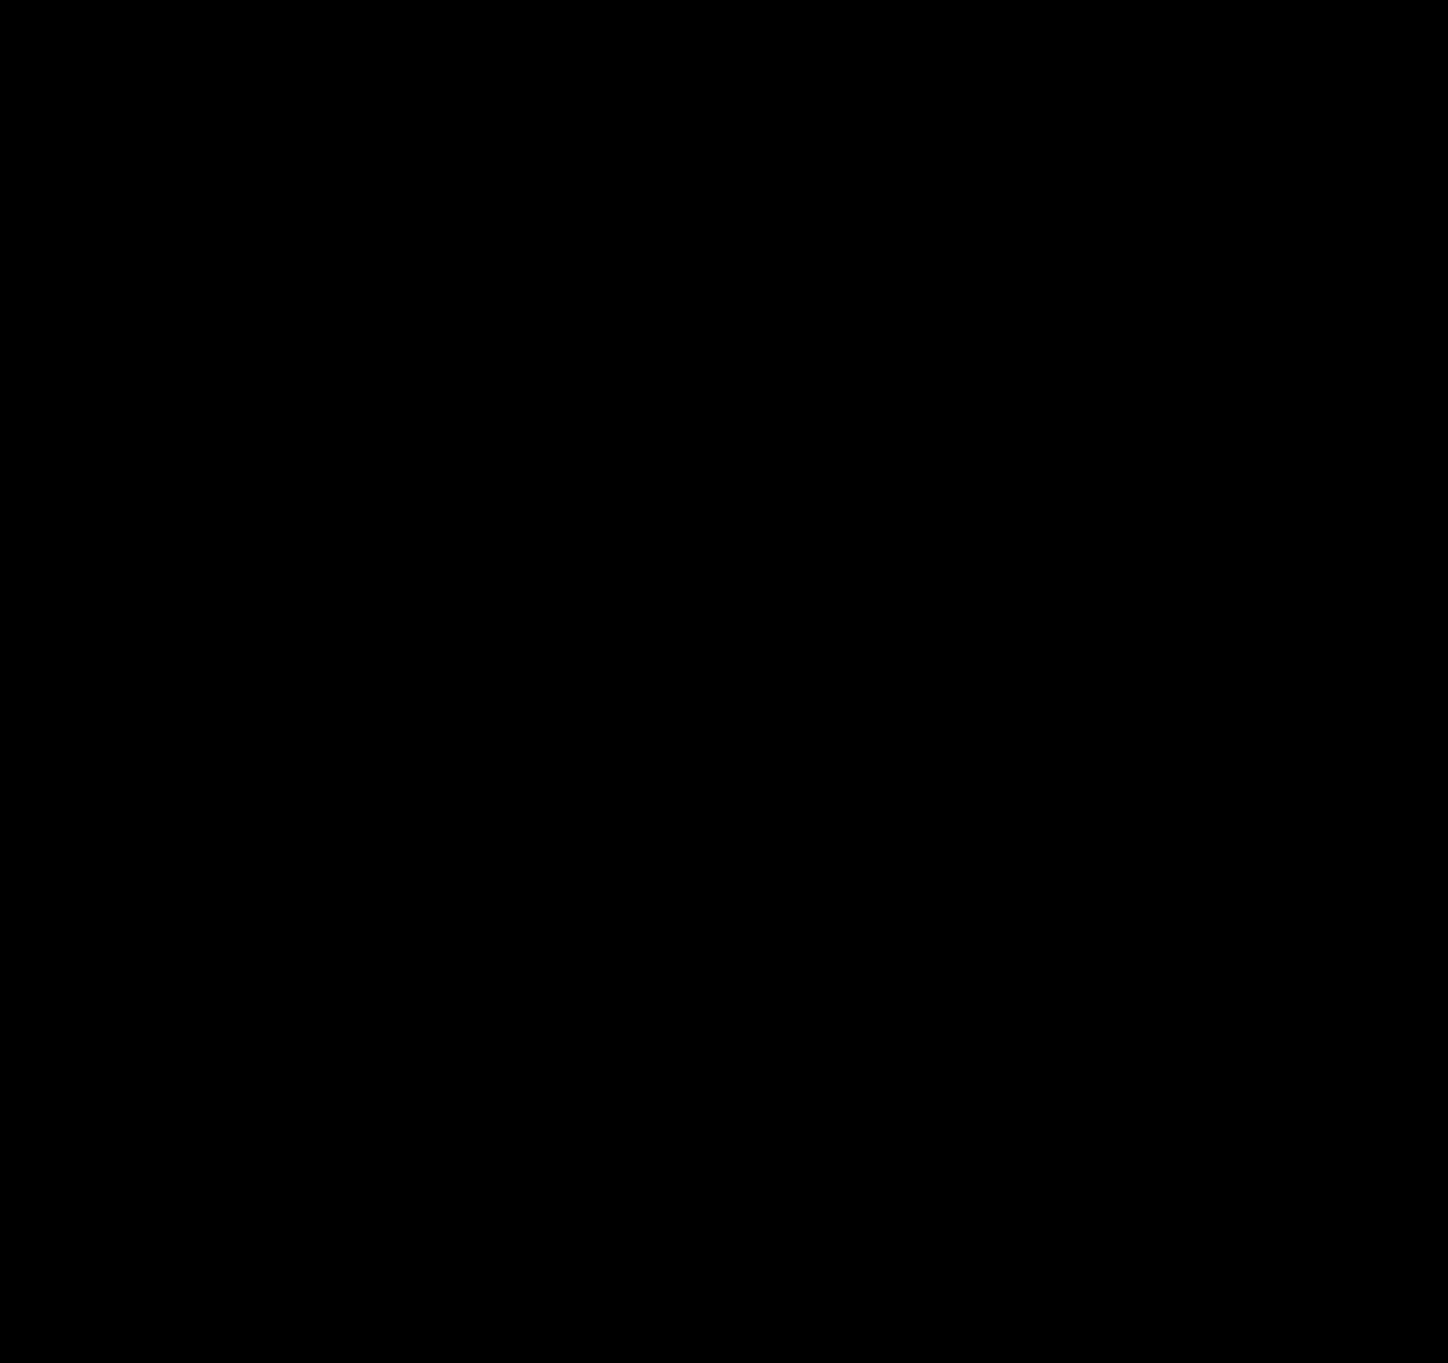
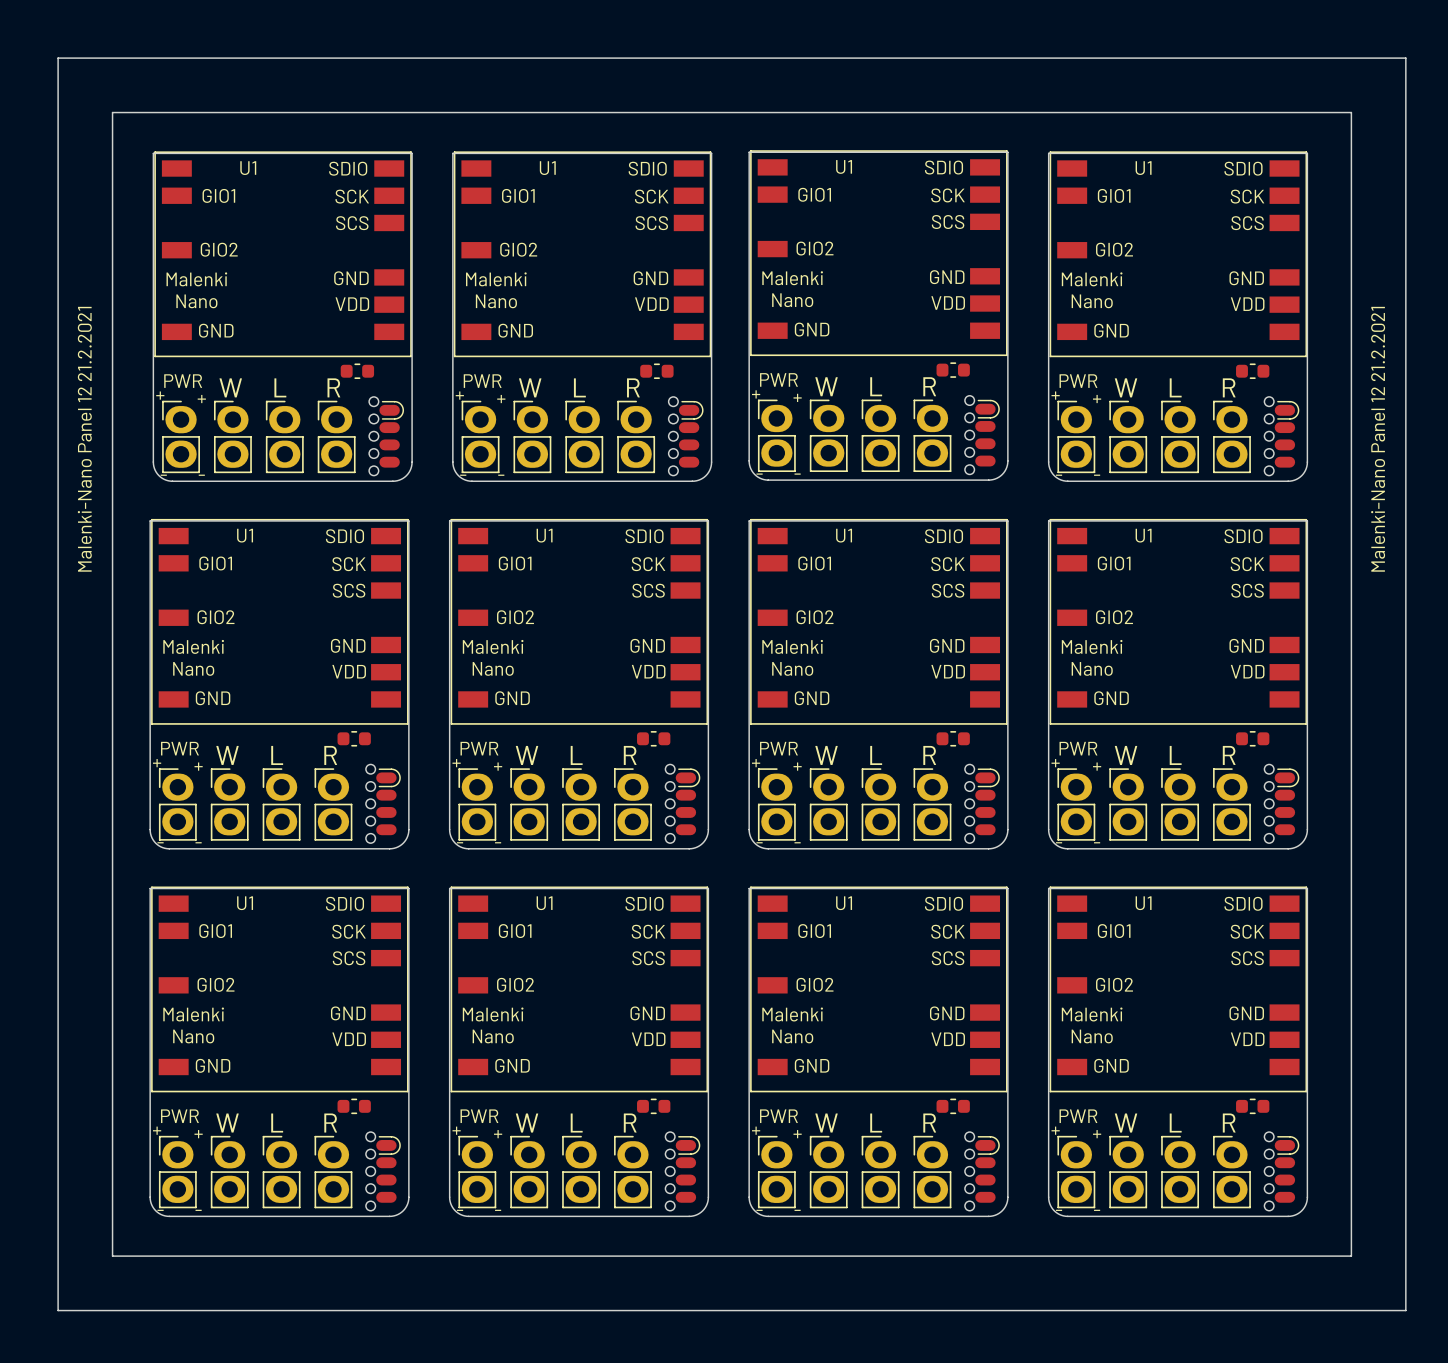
board edge: none -> (58, 58) (1405, 58) (1405, 1310) (58, 1310) (58, 58)
board edge: none -> (112, 112) (112, 1256) (1351, 1256) (1351, 112) (112, 112)
board edge: none -> (749, 152) (1007, 152) (1007, 460) (1005, 469) (1000, 475) (988, 480) (768, 480) (759, 478) (753, 472) (749, 460) (749, 152)
board edge: none -> (153, 153) (412, 153) (412, 462) (410, 470) (404, 477) (392, 481) (172, 481) (164, 479) (157, 474) (153, 462) (153, 153)
board edge: none -> (452, 153) (711, 153) (711, 462) (709, 470) (704, 477) (692, 481) (471, 481) (463, 479) (456, 474) (452, 462) (452, 153)
board edge: none -> (1048, 153) (1048, 462) (1052, 473) (1059, 479) (1067, 481) (1288, 481) (1300, 477) (1305, 470) (1307, 462) (1307, 153) (1048, 153)
U1: none -> (878, 253)
U1: none -> (283, 254)
U1: none -> (582, 254)
U1: none -> (1178, 254)
text: none -> Malenki (792, 278)
text: none -> Malenki (196, 279)
text: none -> Malenki (496, 279)
text: none -> Malenki (1092, 279)
text: none -> Nano (792, 300)
text: none -> Nano (196, 301)
text: none -> Nano (496, 301)
text: none -> Nano (1092, 301)
part: none -> (953, 370)
part: none -> (357, 371)
part: none -> (656, 371)
part: none -> (1252, 371)
text: none -> PWR (778, 379)
text: none -> PWR (183, 381)
text: none -> PWR (482, 381)
text: none -> PWR (1078, 381)
text: none -> W (826, 386)
text: none -> L (876, 386)
text: none -> R (929, 386)
text: none -> W (230, 387)
text: none -> L (280, 387)
text: none -> R (333, 387)
text: none -> W (530, 387)
text: none -> L (579, 387)
text: none -> R (633, 387)
text: none -> W (1126, 387)
text: none -> L (1175, 387)
text: none -> R (1229, 387)
text: none -> + (756, 394)
text: none -> + (160, 395)
text: none -> + (459, 395)
text: none -> + (1055, 395)
text: none -> + (797, 397)
text: none -> + (201, 399)
text: none -> + (501, 399)
text: none -> + (1097, 399)
part: none -> (776, 435)
part: none -> (828, 435)
part: none -> (880, 435)
part: none -> (932, 435)
part: none -> (982, 435)
part: none -> (181, 436)
part: none -> (232, 436)
part: none -> (284, 436)
part: none -> (336, 436)
part: none -> (386, 436)
part: none -> (480, 436)
part: none -> (532, 436)
part: none -> (584, 436)
part: none -> (636, 436)
part: none -> (686, 436)
part: none -> (1076, 436)
part: none -> (1128, 436)
part: none -> (1180, 436)
part: none -> (1231, 436)
part: none -> (1281, 436)
text: none -> Malenki-Nano Panel 12 21.2.2021 (84, 439)
text: none -> Malenki-Nano Panel 12 21.2.2021 (1378, 439)
text: none -> - (759, 474)
text: none -> - (797, 474)
text: none -> - (163, 475)
text: none -> - (201, 475)
text: none -> - (463, 475)
text: none -> - (501, 475)
text: none -> - (1059, 475)
text: none -> - (1097, 475)
board edge: none -> (150, 520) (408, 520) (408, 829) (406, 838) (401, 844) (389, 848) (169, 848) (160, 846) (154, 841) (150, 829) (150, 520)
board edge: none -> (449, 520) (708, 520) (708, 829) (706, 838) (701, 844) (689, 848) (468, 848) (460, 846) (453, 841) (449, 829) (449, 520)
board edge: none -> (749, 520) (1007, 520) (1007, 829) (1005, 838) (1000, 844) (988, 848) (768, 848) (759, 846) (753, 841) (749, 829) (749, 520)
board edge: none -> (1048, 520) (1307, 520) (1307, 829) (1305, 838) (1300, 844) (1288, 848) (1067, 848) (1059, 846) (1052, 841) (1048, 829) (1048, 520)
U1: none -> (279, 621)
U1: none -> (579, 621)
U1: none -> (878, 621)
U1: none -> (1178, 621)
text: none -> Malenki (193, 646)
text: none -> Malenki (493, 646)
text: none -> Malenki (792, 646)
text: none -> Malenki (1092, 646)
text: none -> Nano (193, 668)
text: none -> Nano (493, 668)
text: none -> Nano (792, 668)
text: none -> Nano (1092, 668)
part: none -> (354, 738)
part: none -> (653, 738)
part: none -> (953, 738)
part: none -> (1252, 738)
text: none -> PWR (179, 748)
text: none -> PWR (479, 748)
text: none -> PWR (778, 748)
text: none -> PWR (1078, 748)
text: none -> W (227, 755)
text: none -> L (277, 755)
text: none -> R (330, 755)
text: none -> W (527, 755)
text: none -> L (576, 755)
text: none -> R (630, 755)
text: none -> W (826, 755)
text: none -> L (876, 755)
text: none -> R (929, 755)
text: none -> W (1126, 755)
text: none -> L (1175, 755)
text: none -> R (1229, 755)
text: none -> + (157, 763)
text: none -> + (456, 763)
text: none -> + (756, 763)
text: none -> + (1055, 763)
text: none -> + (198, 766)
text: none -> + (498, 766)
text: none -> + (797, 766)
text: none -> + (1097, 766)
part: none -> (383, 803)
part: none -> (682, 803)
part: none -> (982, 803)
part: none -> (1281, 803)
part: none -> (177, 804)
part: none -> (229, 804)
part: none -> (281, 804)
part: none -> (333, 804)
part: none -> (477, 804)
part: none -> (529, 804)
part: none -> (581, 804)
part: none -> (632, 804)
part: none -> (776, 804)
part: none -> (828, 804)
part: none -> (880, 804)
part: none -> (932, 804)
part: none -> (1076, 804)
part: none -> (1128, 804)
part: none -> (1180, 804)
part: none -> (1231, 804)
text: none -> - (160, 842)
text: none -> - (198, 842)
text: none -> - (460, 842)
text: none -> - (498, 842)
text: none -> - (759, 842)
text: none -> - (797, 842)
text: none -> - (1059, 842)
text: none -> - (1097, 842)
board edge: none -> (150, 888) (408, 888) (408, 1197) (406, 1205) (401, 1212) (389, 1216) (169, 1216) (160, 1214) (154, 1209) (150, 1197) (150, 888)
board edge: none -> (449, 888) (708, 888) (708, 1197) (706, 1205) (701, 1212) (689, 1216) (468, 1216) (460, 1214) (453, 1209) (449, 1197) (449, 888)
board edge: none -> (749, 888) (749, 1197) (753, 1209) (759, 1214) (768, 1216) (988, 1216) (1000, 1212) (1005, 1205) (1007, 1197) (1007, 888) (749, 888)
board edge: none -> (1048, 888) (1307, 888) (1307, 1197) (1305, 1205) (1300, 1212) (1288, 1216) (1067, 1216) (1059, 1214) (1052, 1209) (1048, 1197) (1048, 888)
U1: none -> (279, 989)
U1: none -> (579, 989)
U1: none -> (878, 989)
U1: none -> (1178, 989)
text: none -> Malenki (193, 1014)
text: none -> Malenki (493, 1014)
text: none -> Malenki (792, 1014)
text: none -> Malenki (1092, 1014)
text: none -> Nano (193, 1036)
text: none -> Nano (493, 1036)
text: none -> Nano (792, 1036)
text: none -> Nano (1092, 1036)
part: none -> (354, 1106)
part: none -> (653, 1106)
part: none -> (953, 1106)
part: none -> (1252, 1106)
text: none -> PWR (179, 1116)
text: none -> PWR (479, 1116)
text: none -> PWR (778, 1116)
text: none -> PWR (1078, 1116)
text: none -> W (227, 1123)
text: none -> L (277, 1123)
text: none -> R (330, 1123)
text: none -> W (527, 1123)
text: none -> L (576, 1123)
text: none -> R (630, 1123)
text: none -> W (826, 1123)
text: none -> L (876, 1123)
text: none -> R (929, 1123)
text: none -> W (1126, 1123)
text: none -> L (1175, 1123)
text: none -> R (1229, 1123)
text: none -> + (157, 1130)
text: none -> + (456, 1130)
text: none -> + (756, 1130)
text: none -> + (1055, 1130)
text: none -> + (198, 1134)
text: none -> + (498, 1134)
text: none -> + (797, 1134)
text: none -> + (1097, 1134)
part: none -> (383, 1171)
part: none -> (682, 1171)
part: none -> (982, 1171)
part: none -> (1281, 1171)
part: none -> (177, 1172)
part: none -> (229, 1172)
part: none -> (281, 1172)
part: none -> (333, 1172)
part: none -> (477, 1172)
part: none -> (529, 1172)
part: none -> (581, 1172)
part: none -> (632, 1172)
part: none -> (776, 1172)
part: none -> (828, 1172)
part: none -> (880, 1172)
part: none -> (932, 1172)
part: none -> (1076, 1172)
part: none -> (1128, 1172)
part: none -> (1180, 1172)
part: none -> (1231, 1172)
text: none -> - (160, 1210)
text: none -> - (198, 1210)
text: none -> - (460, 1210)
text: none -> - (498, 1210)
text: none -> - (759, 1210)
text: none -> - (797, 1210)
text: none -> - (1059, 1210)
text: none -> - (1097, 1210)

